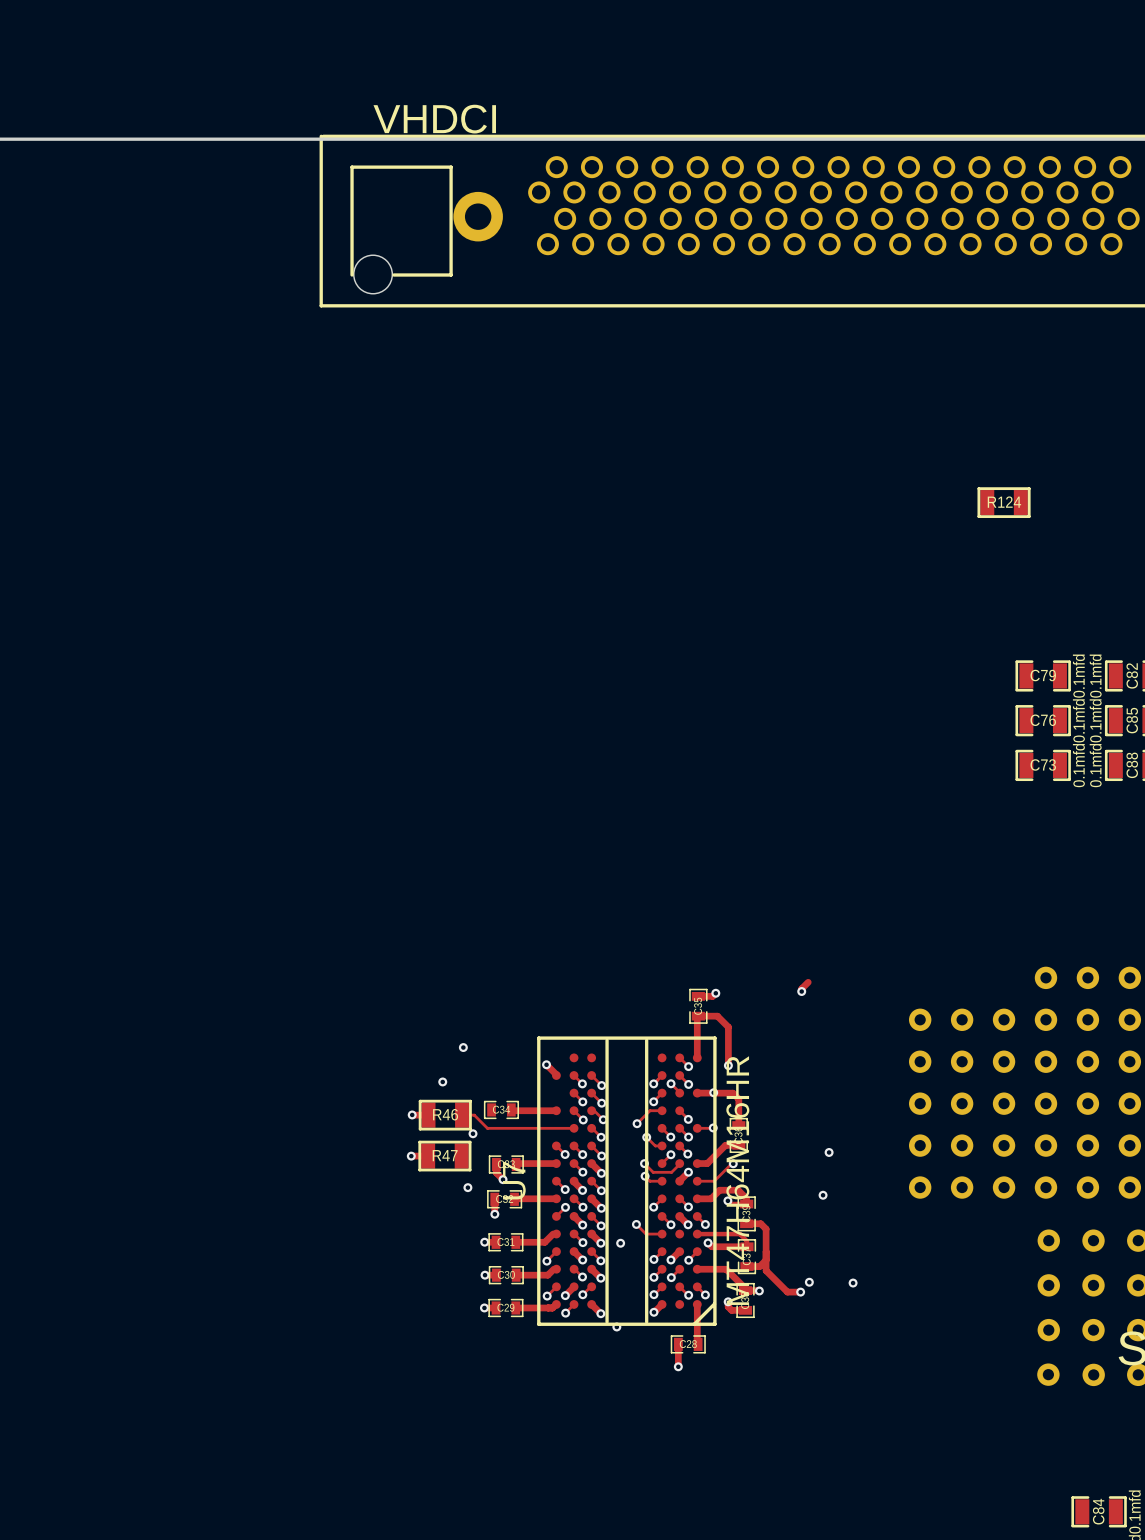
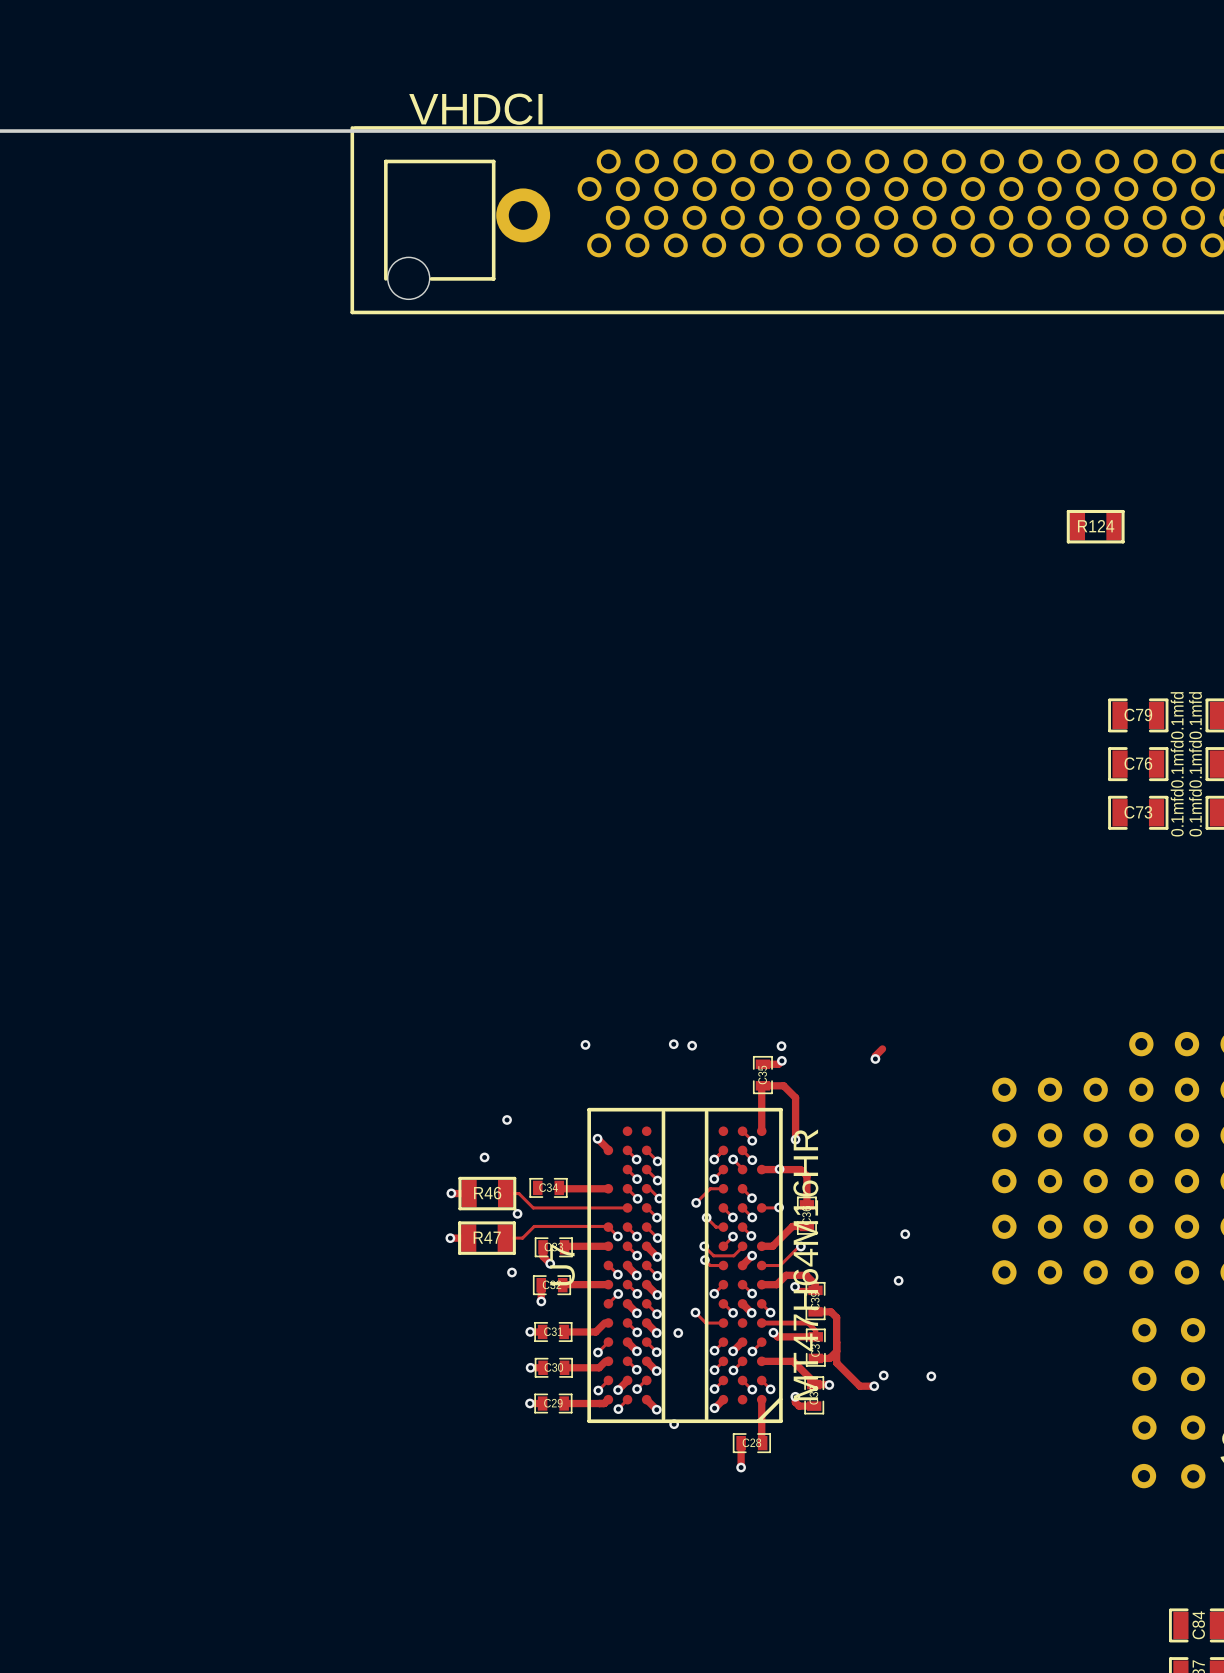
via: none -> (673, 1044)
via: none -> (585, 1044)
via: none -> (692, 1045)
via: none -> (781, 1046)
track: none -> (607, 1226) (534, 1226) (522, 1238) (505, 1238)

